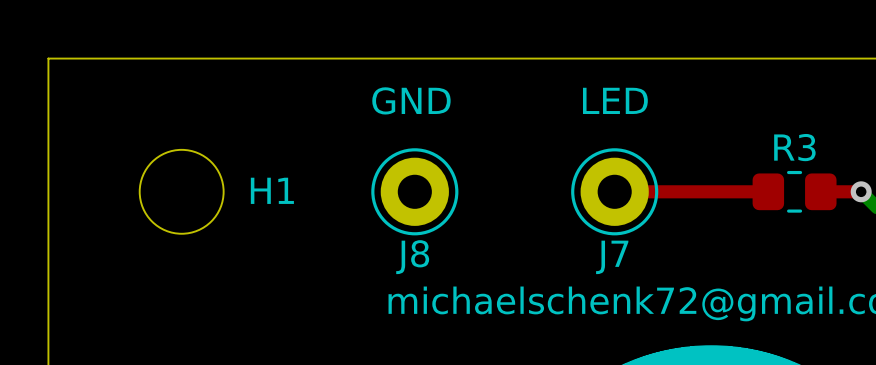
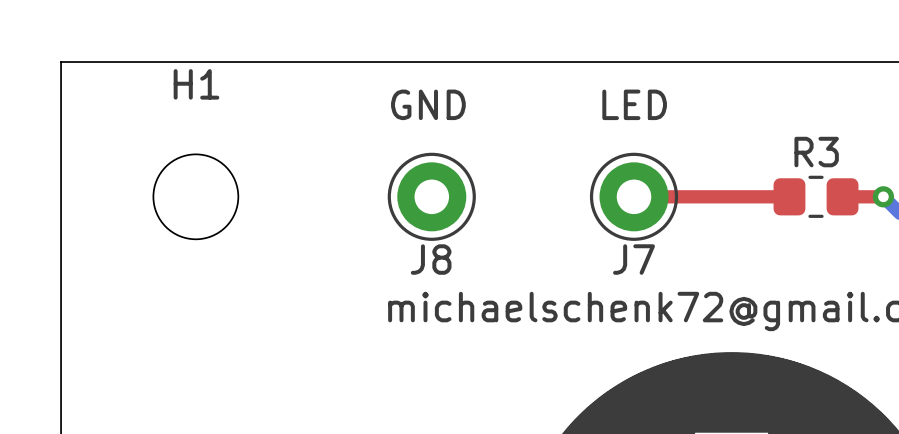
H1 name position: H1 (272, 190) -> H1 (196, 84)

